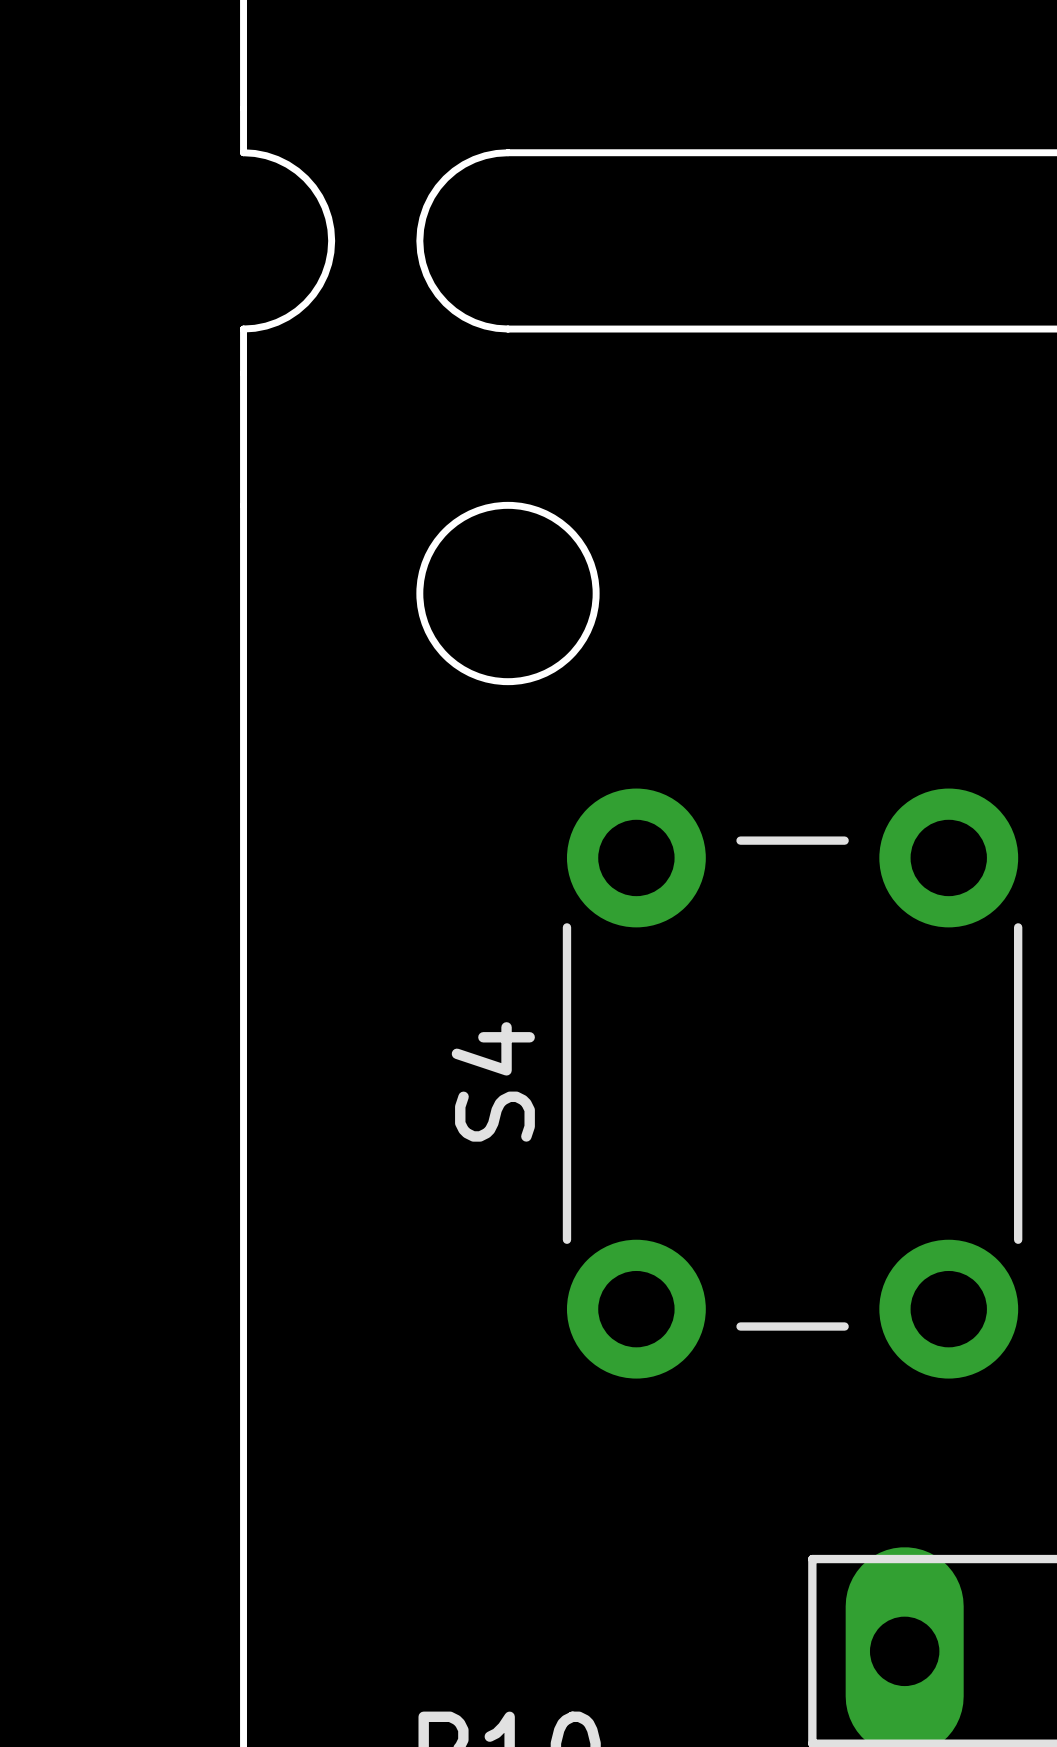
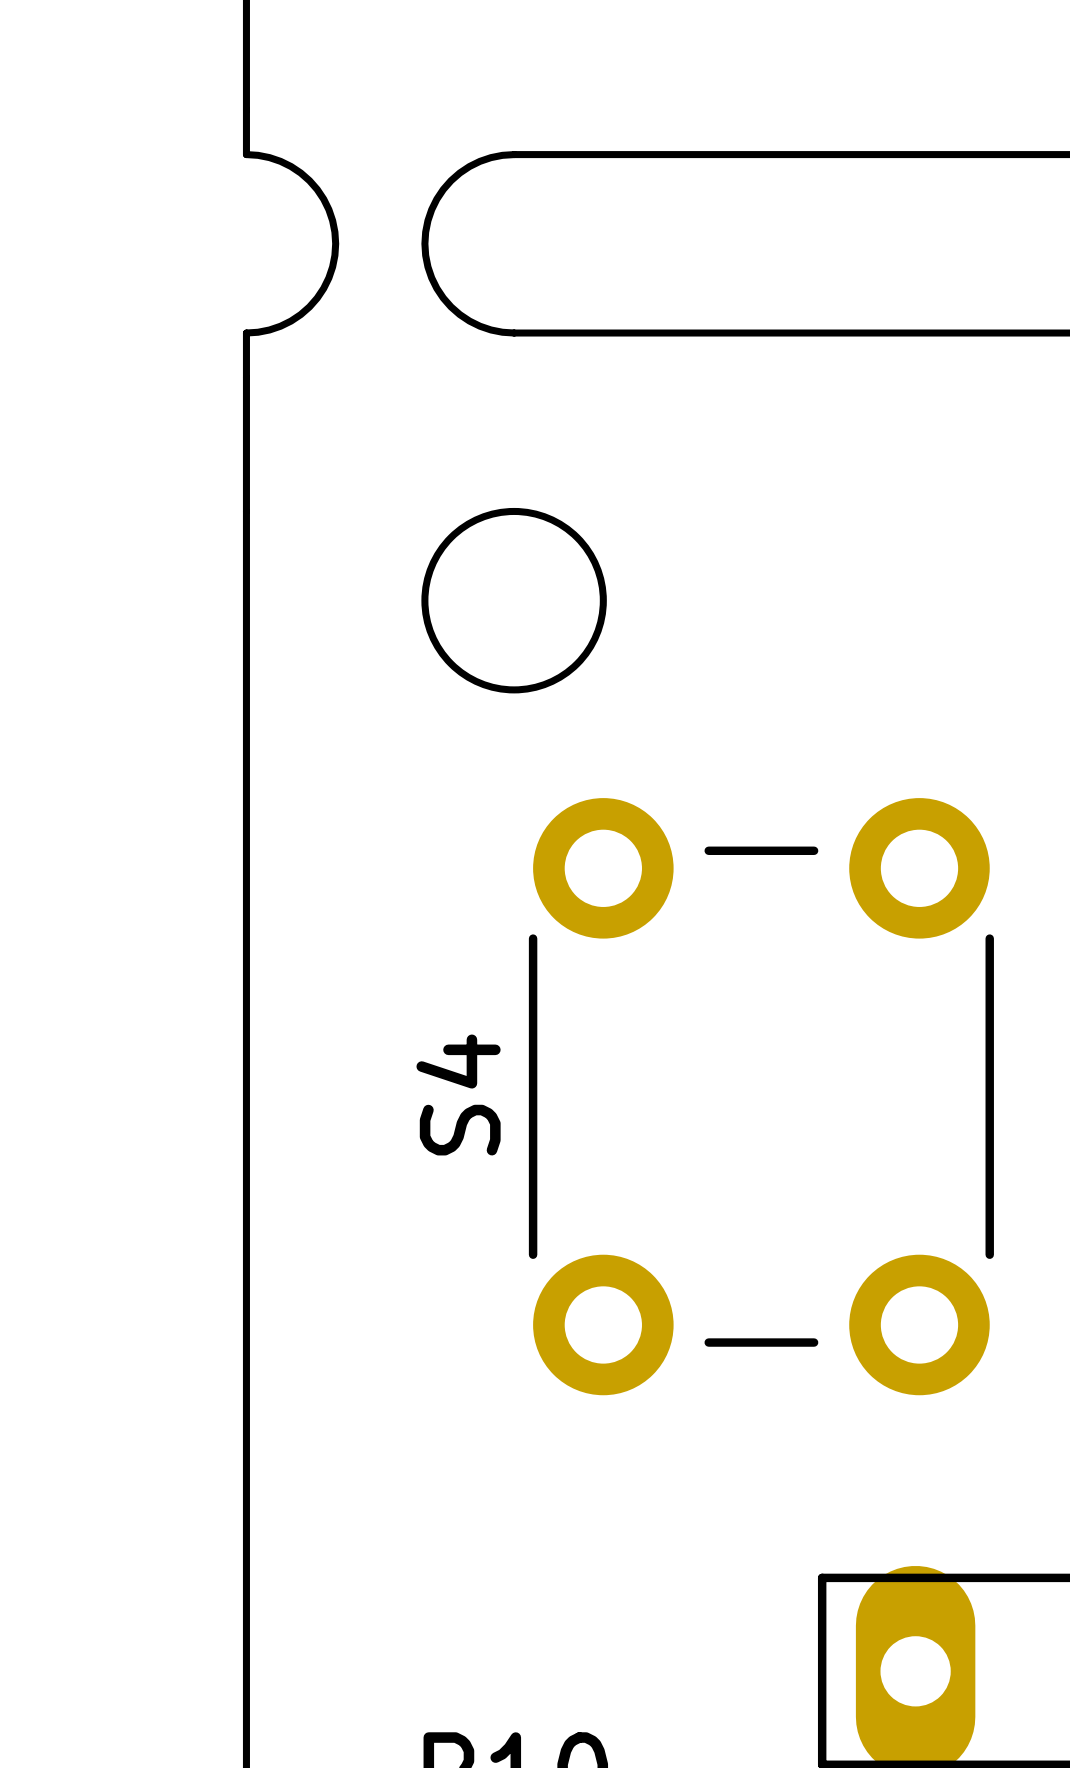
S4 position: (792, 1083) -> (761, 1096)

